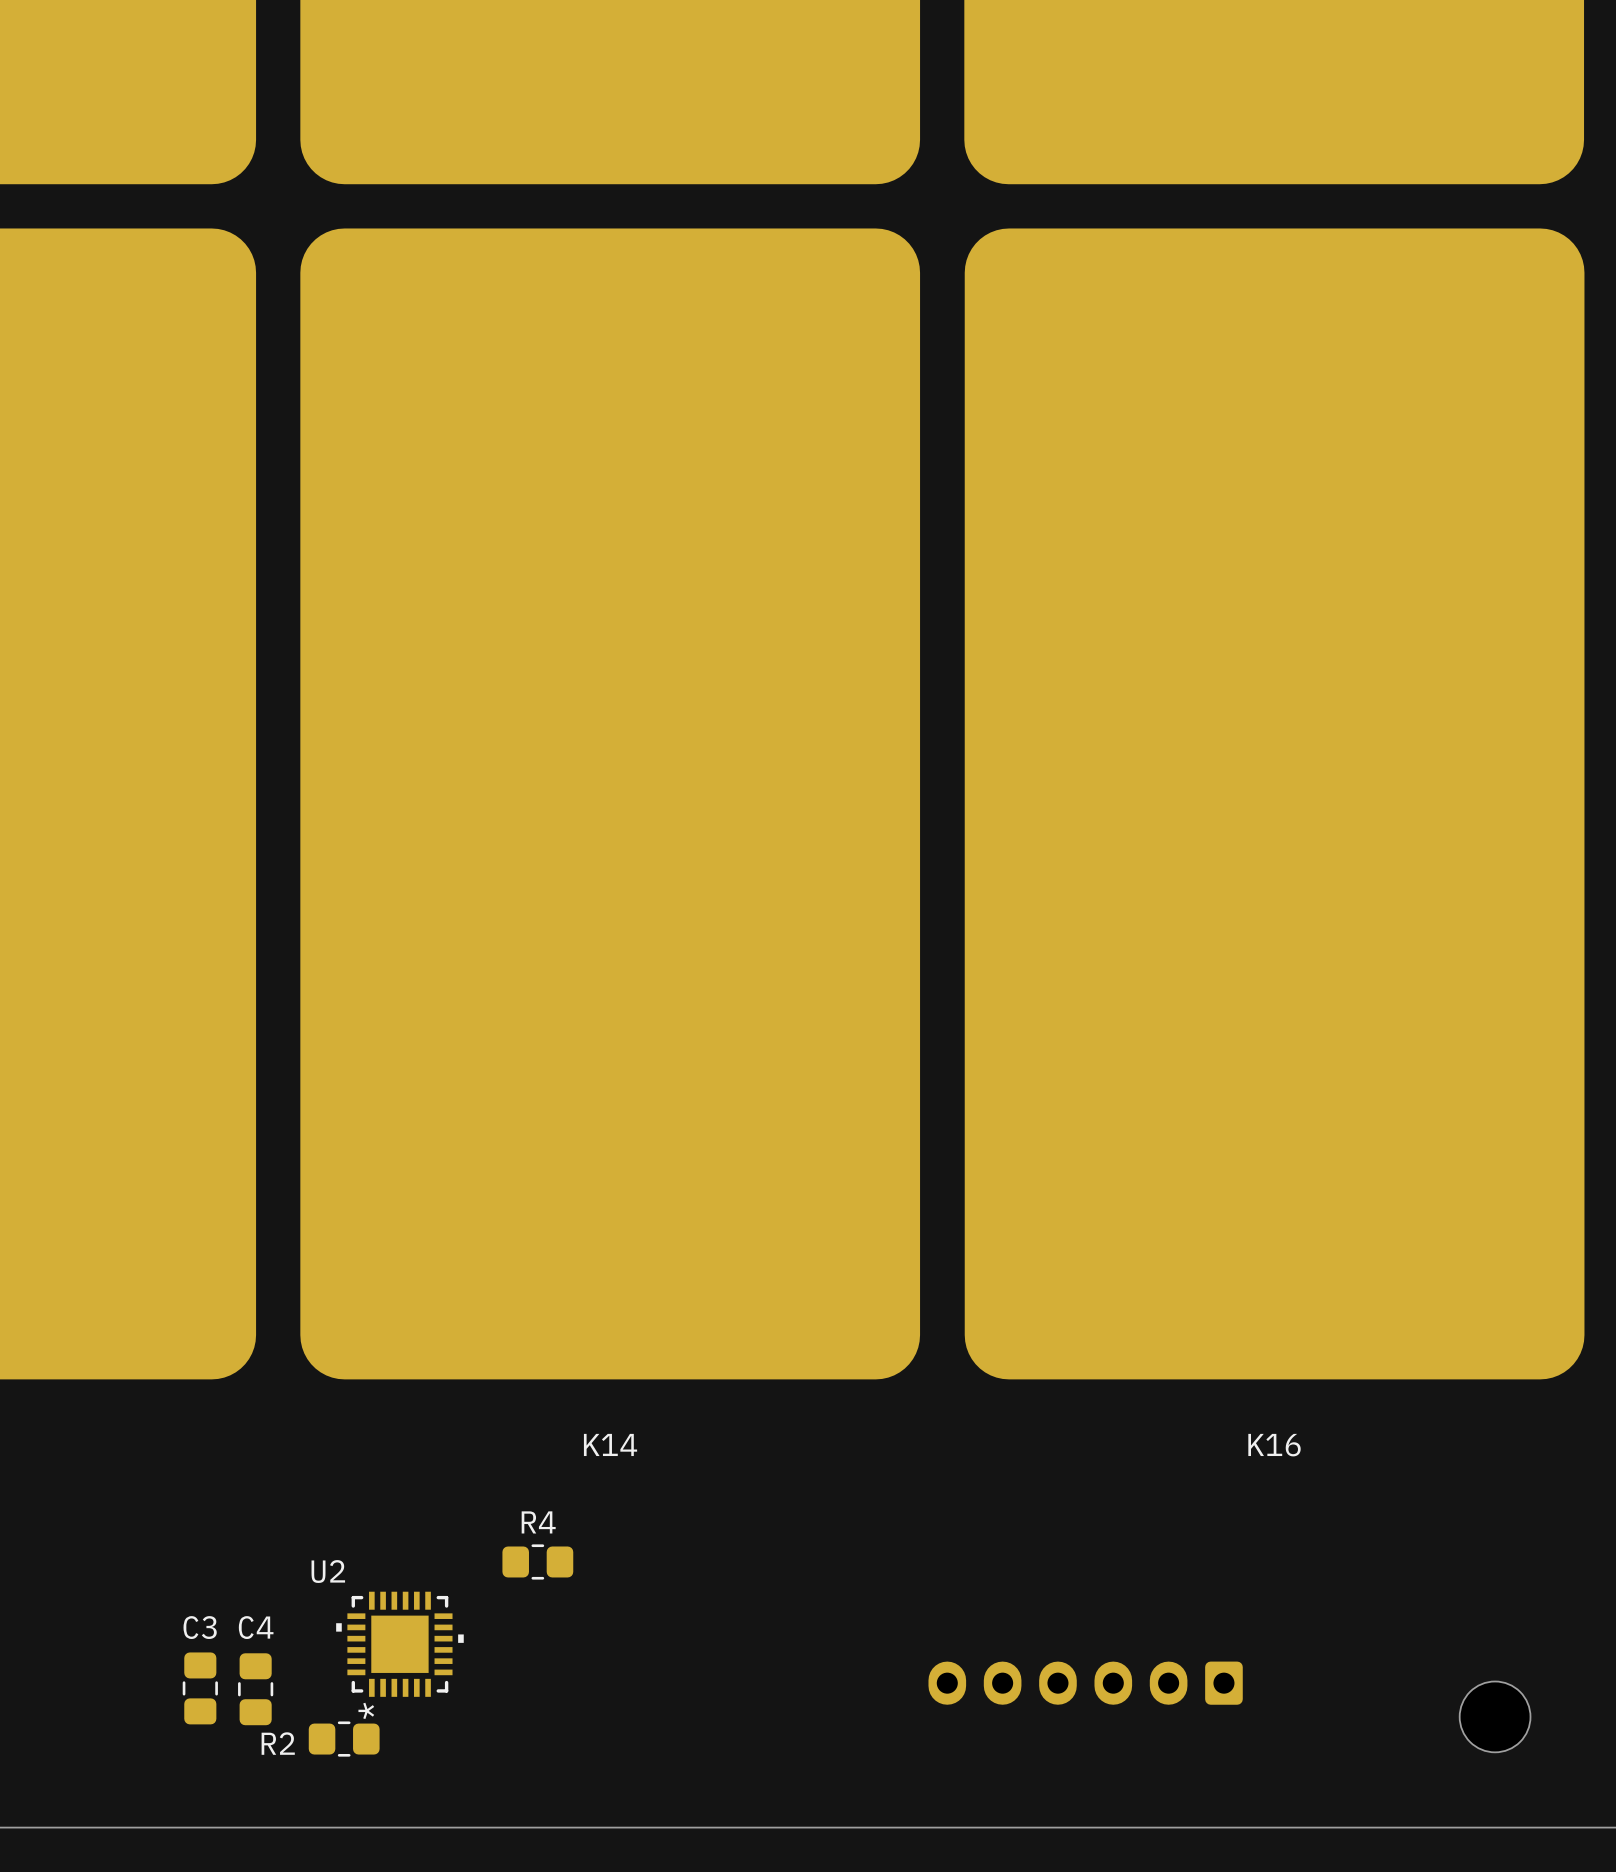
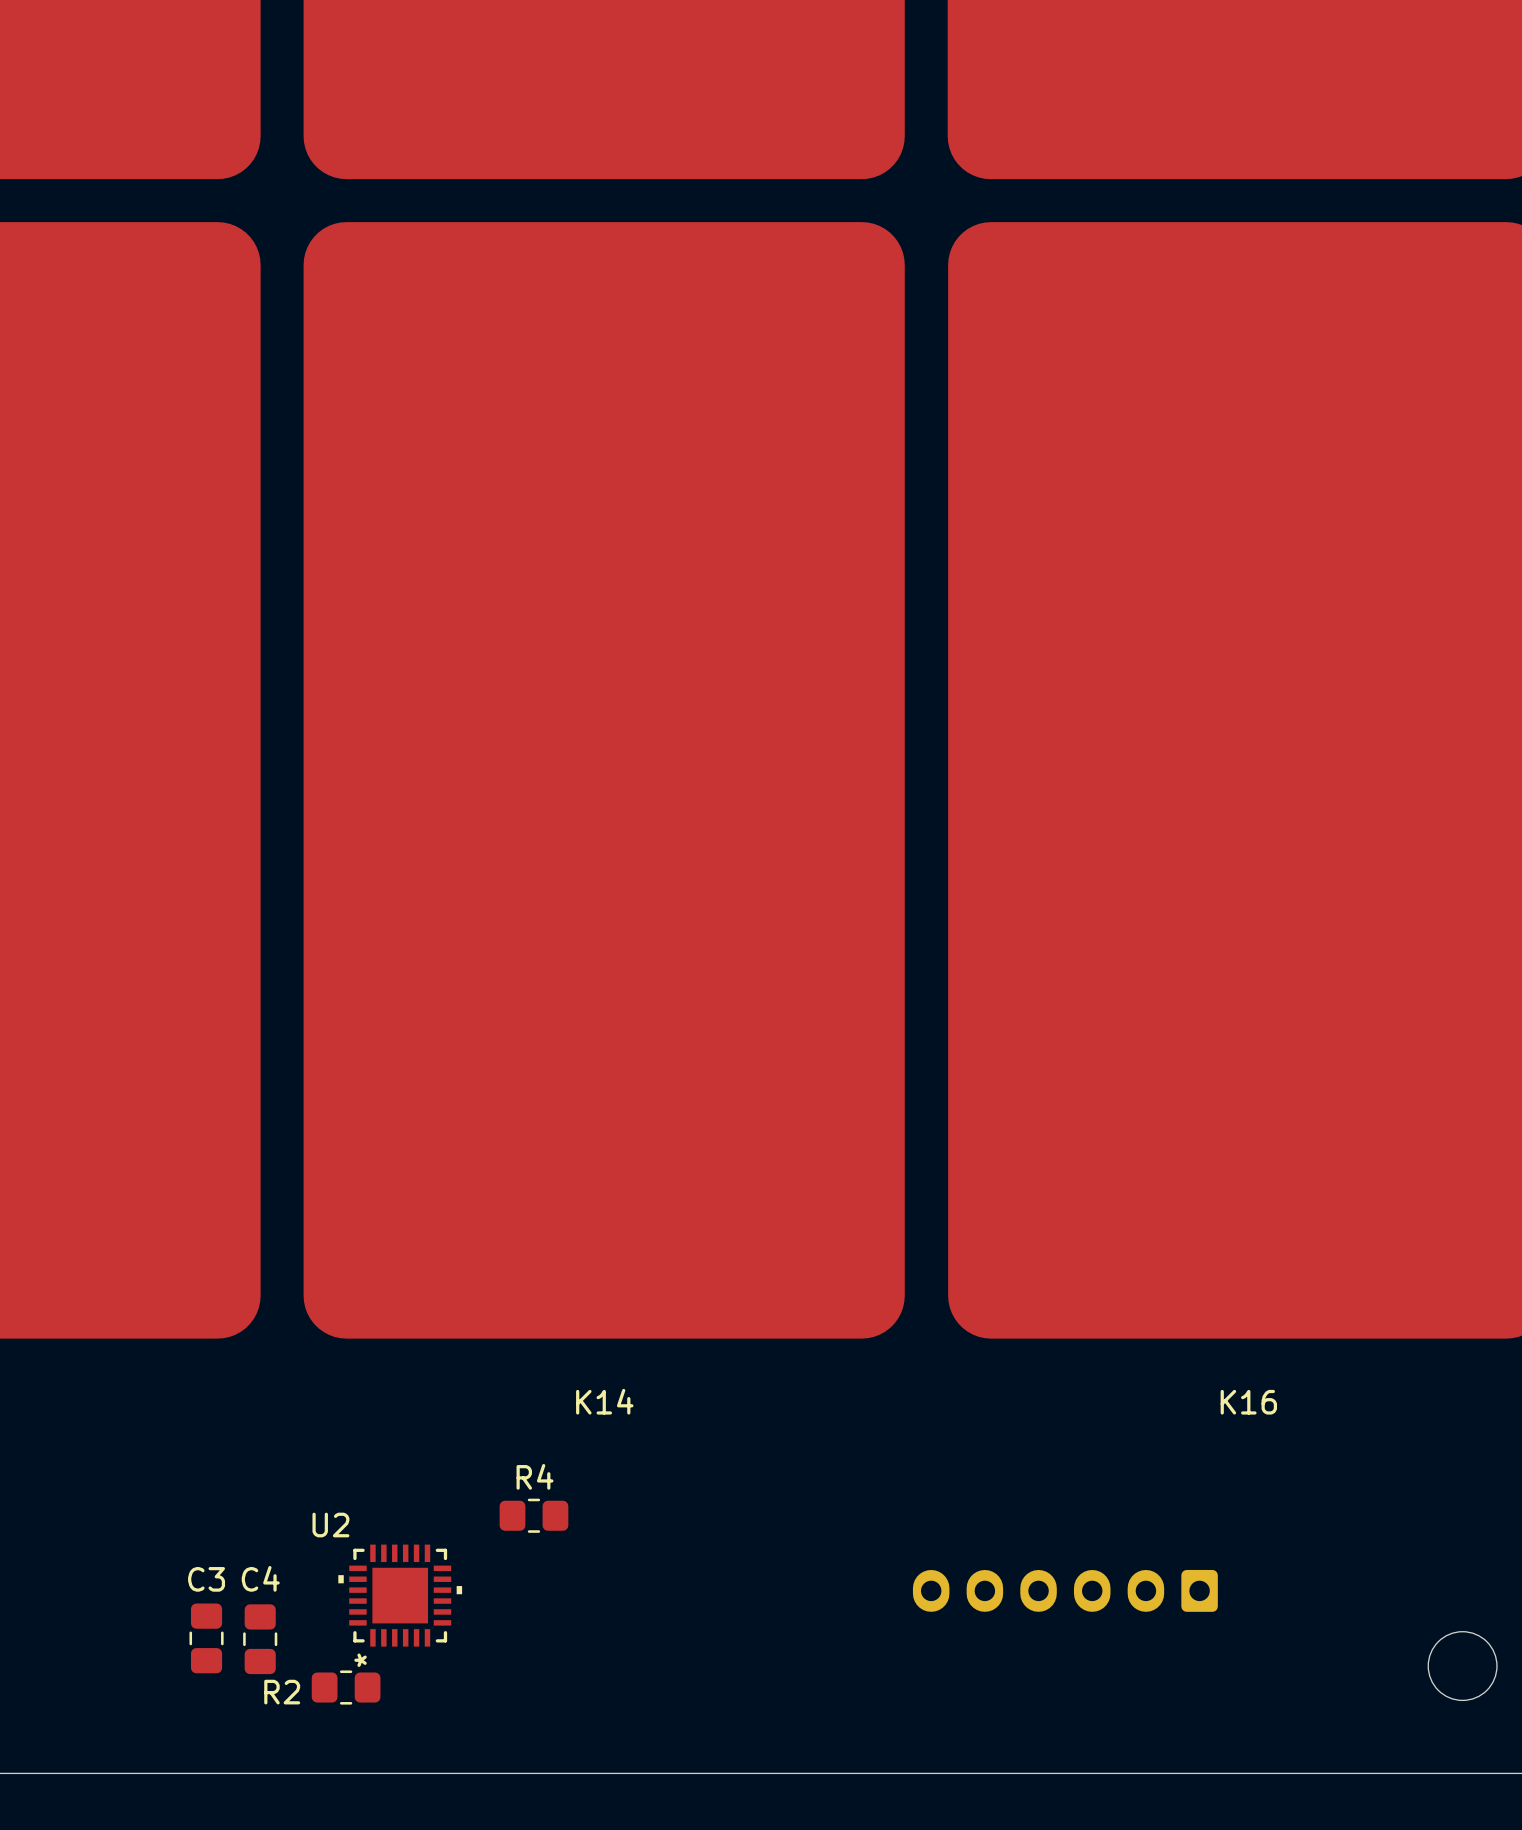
part position: (1085, 1683) -> (1065, 1590)

